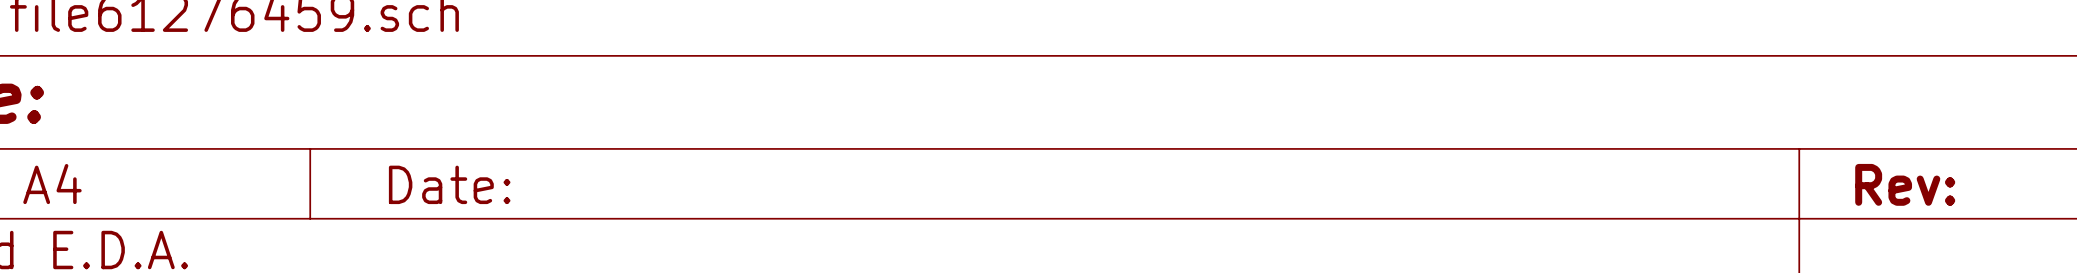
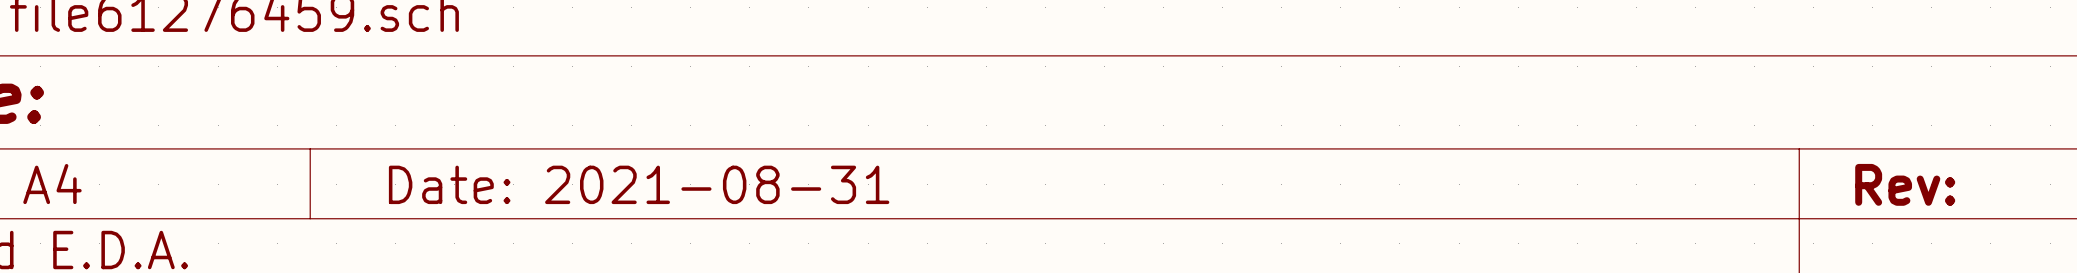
title block: Date: (449, 184) -> Date: 2021-08-31 (639, 184)

